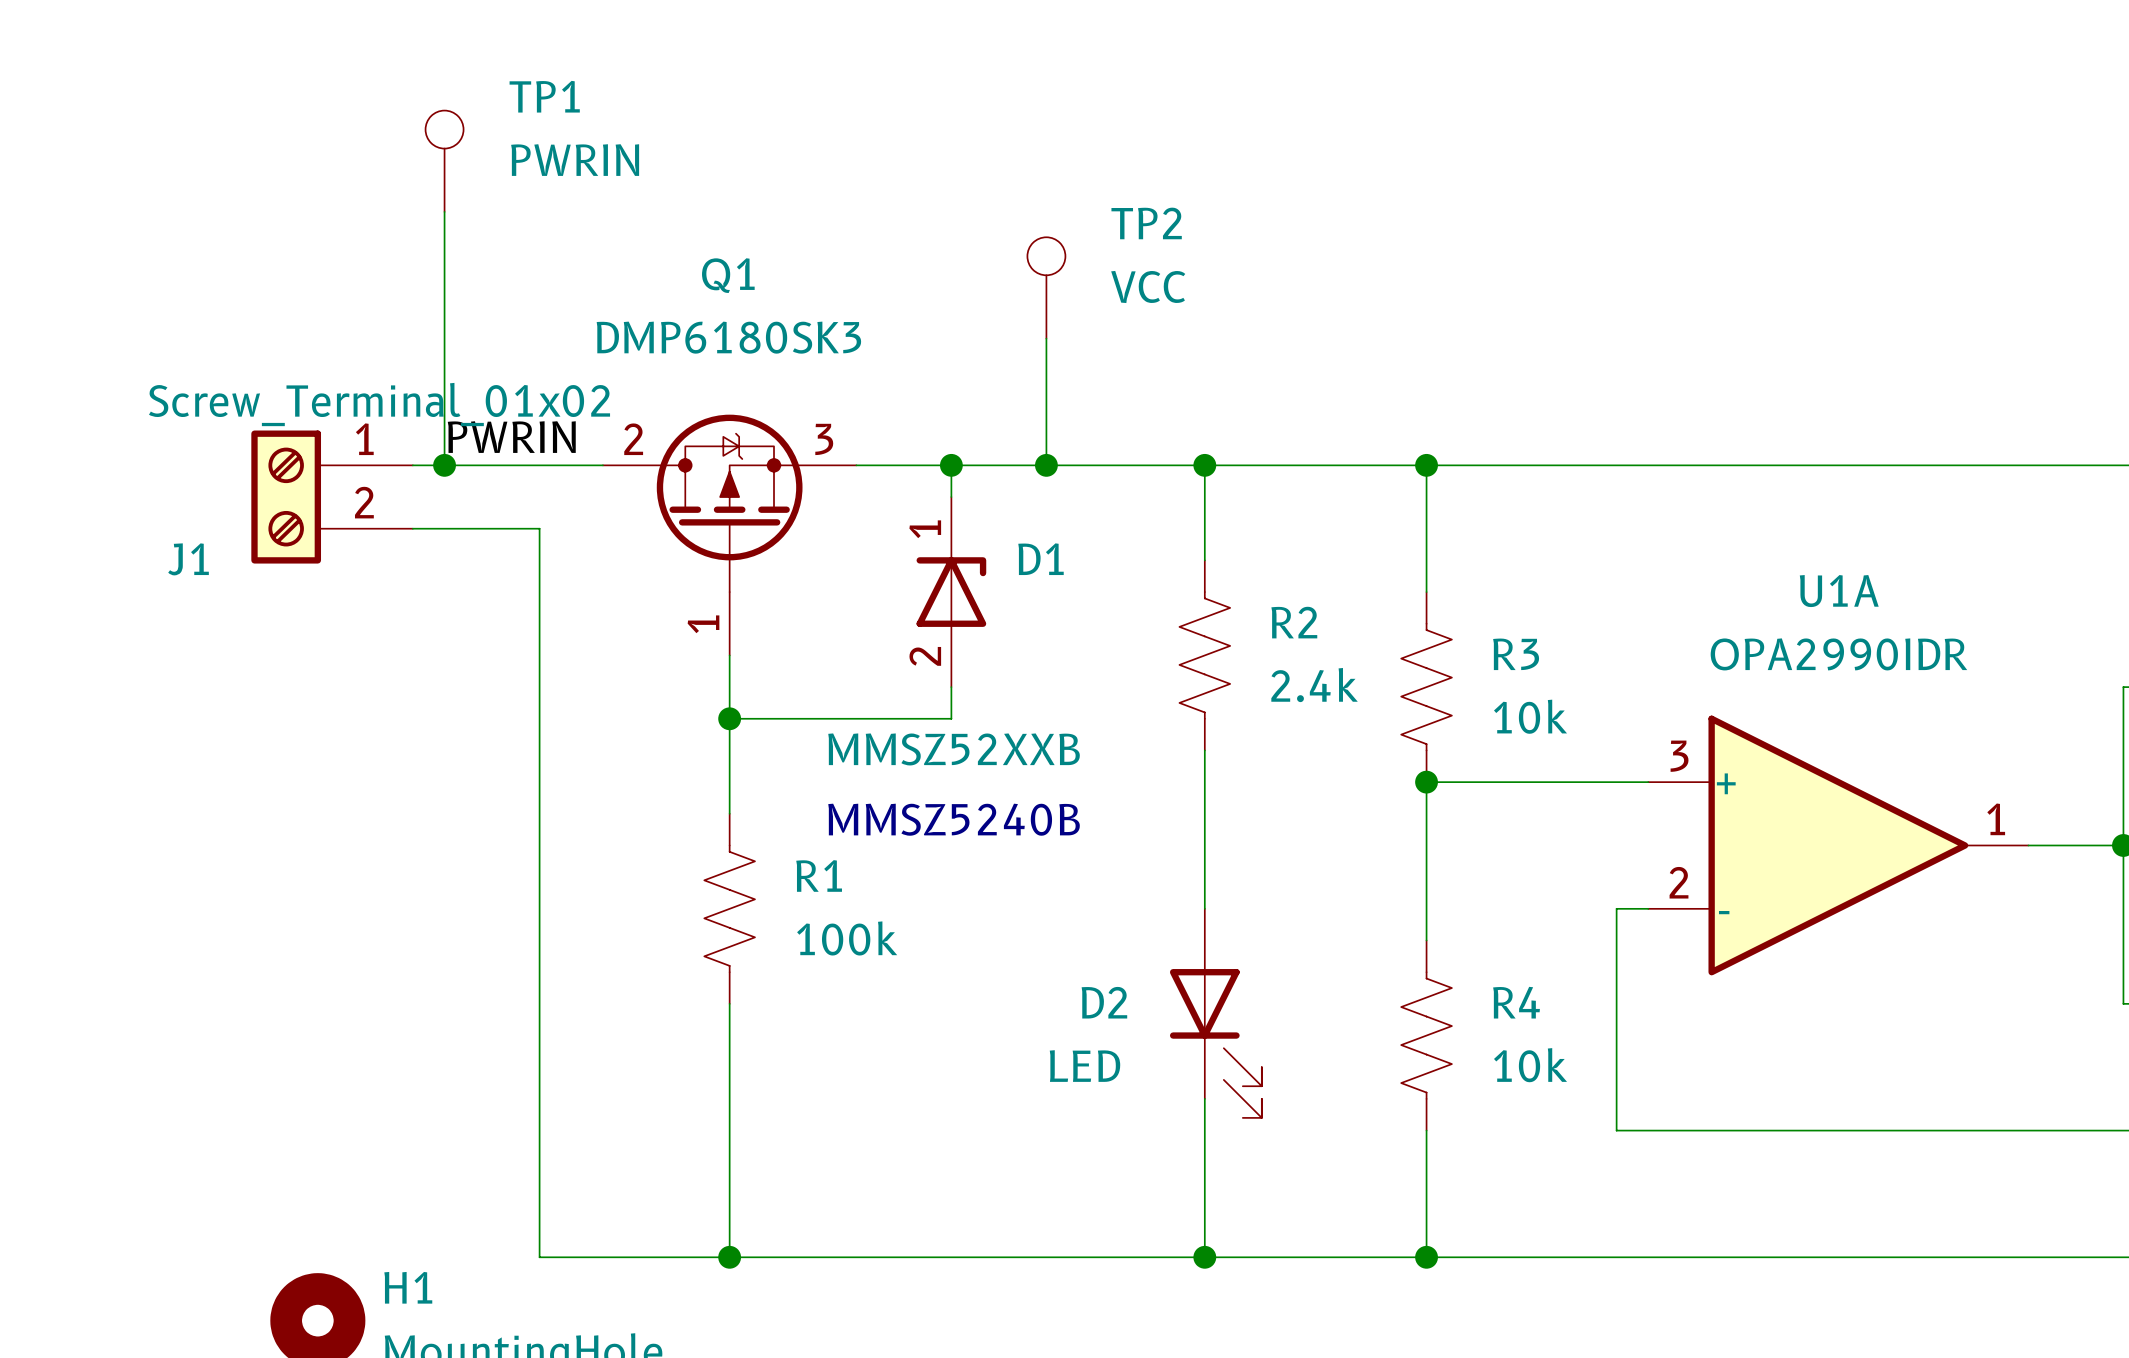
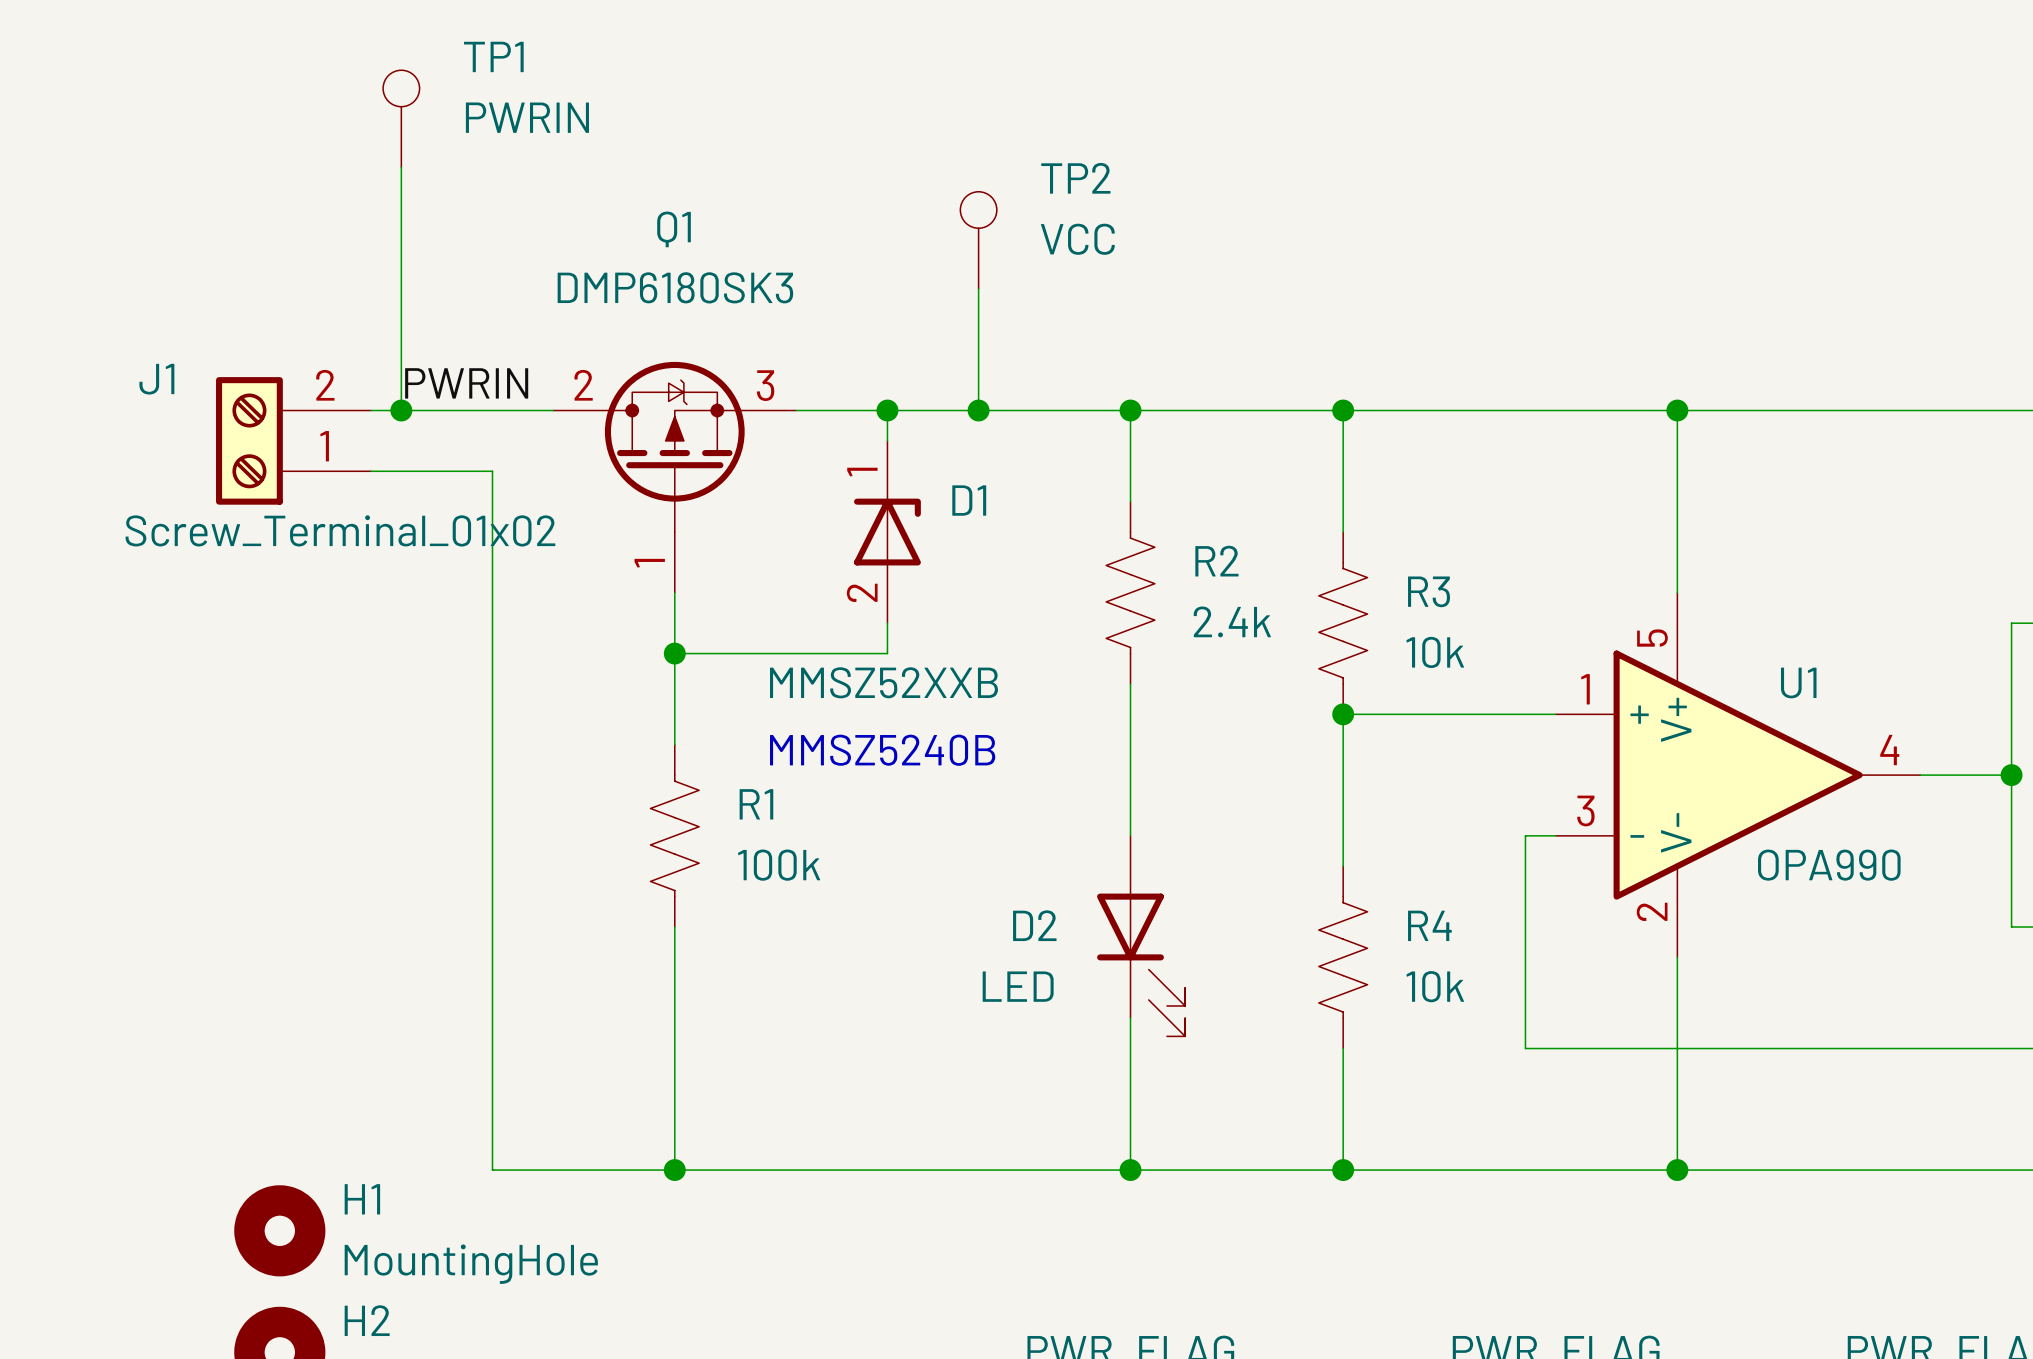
wire: none -> (1677, 410) (1677, 592)
junction: none -> (1677, 410)
J1 flip: as is (286, 497) -> up-down (249, 440)
U1A: OPA2990IDR (1838, 845) -> none
U1: none -> OPA990 (1738, 775)
wire: none -> (1677, 957) (1677, 1170)
junction: none -> (1677, 1170)

